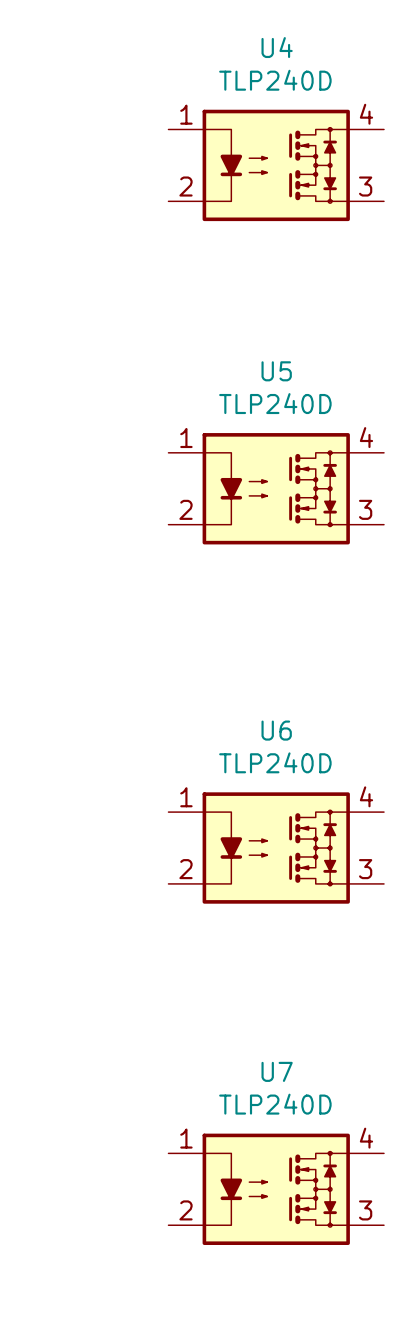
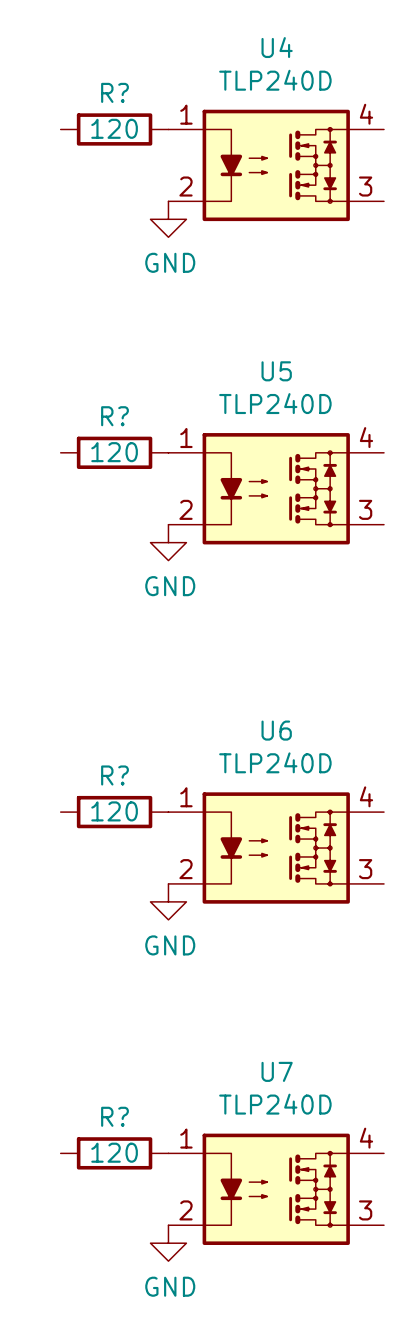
R?: none -> 120 (114, 129)
power symbol: none -> GND (168, 219)
R?: none -> 120 (114, 452)
power symbol: none -> GND (168, 542)
R?: none -> 120 (114, 812)
power symbol: none -> GND (168, 901)
R?: none -> 120 (114, 1153)
power symbol: none -> GND (168, 1243)

